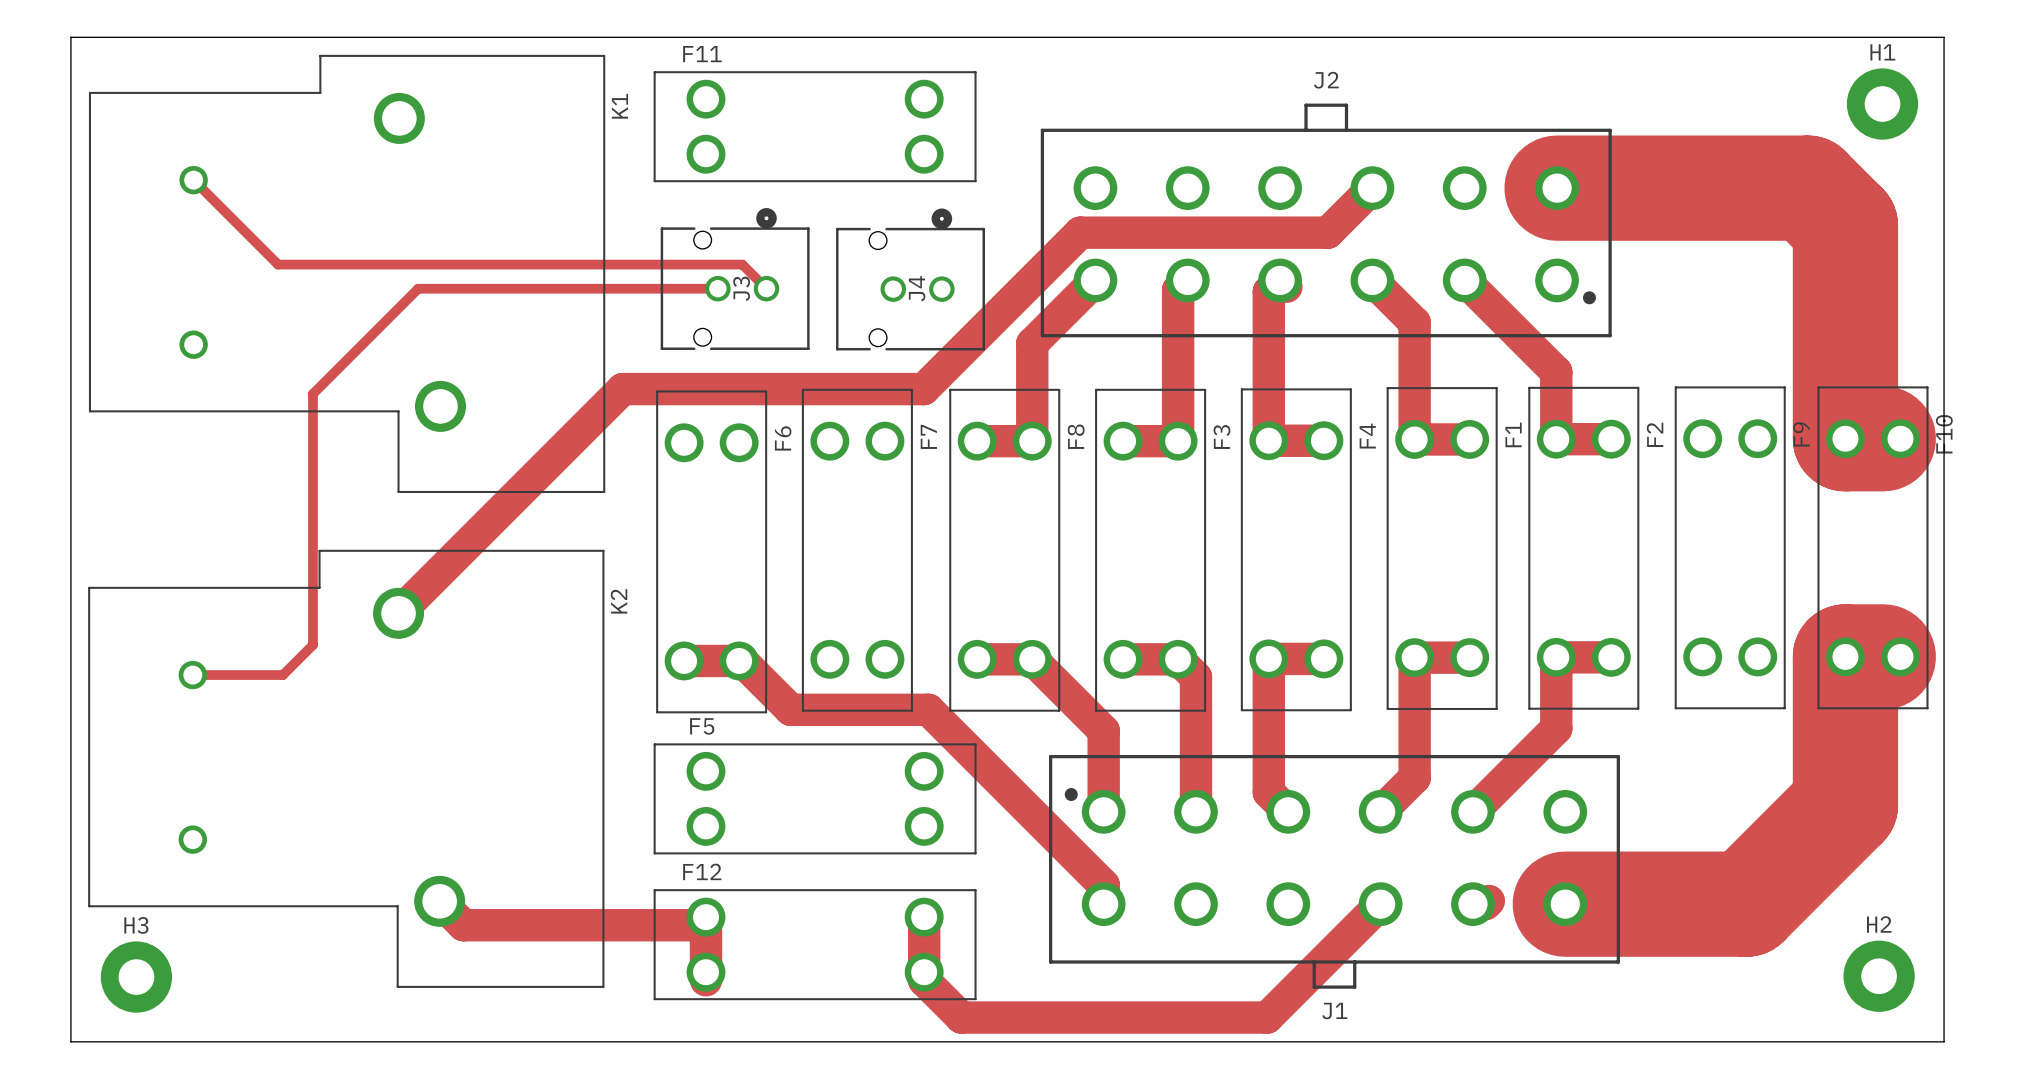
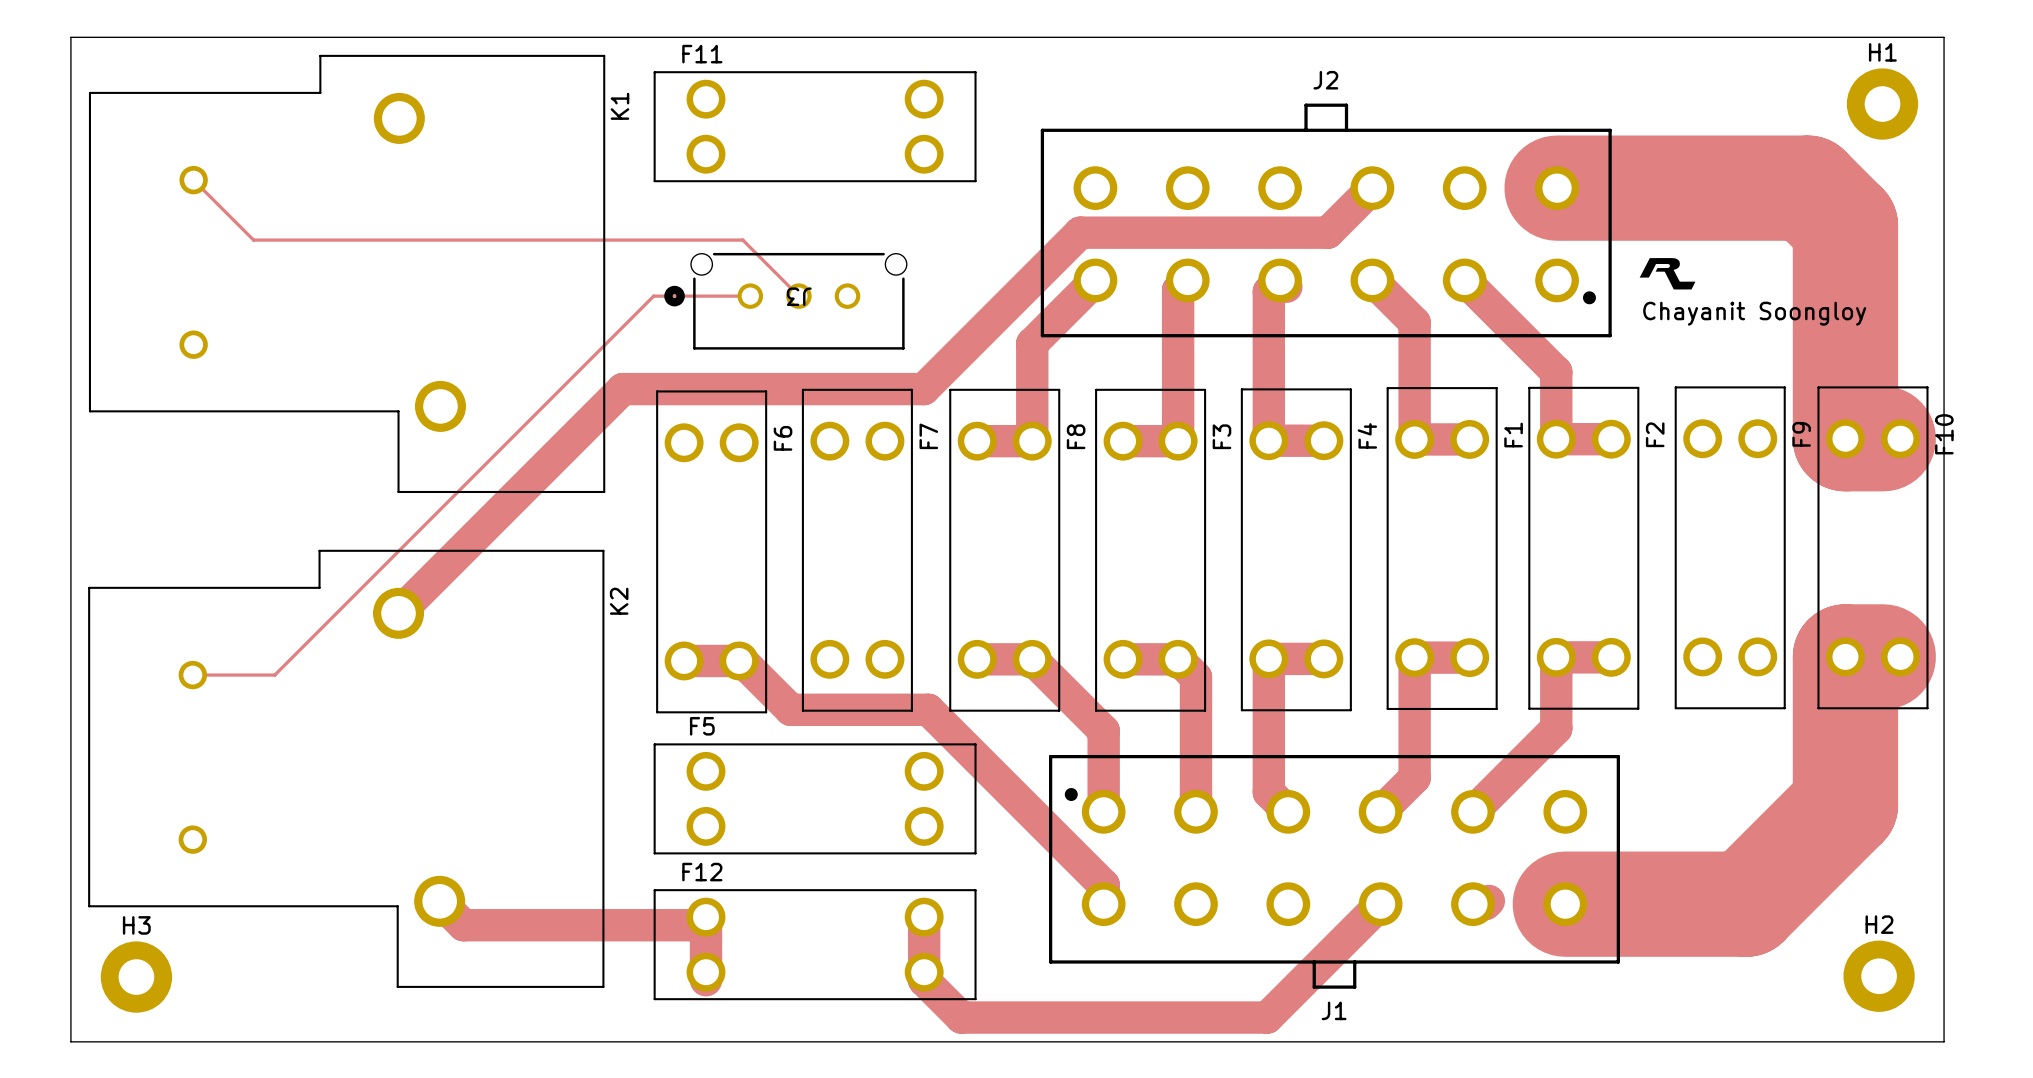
track width: thick (193, 180) (253, 240) -> thin (193, 180) (253, 240)
J3 footprint: [660, 208, 810, 350] -> [664, 252, 907, 350]
track: (253, 240) (278, 264) (742, 264) (766, 288) -> (253, 240) (742, 240) (798, 296)
drawing: none -> [1639, 258, 1696, 290]
J4: (910, 279) -> none
track: (720, 288) (418, 288) (312, 393) (312, 645) (282, 675) (274, 675) -> (750, 296) (653, 296) (274, 675)
text: none -> Chayanit Soongloy (1754, 313)
track width: thick (192, 675) (274, 675) -> thin (192, 675) (274, 675)

